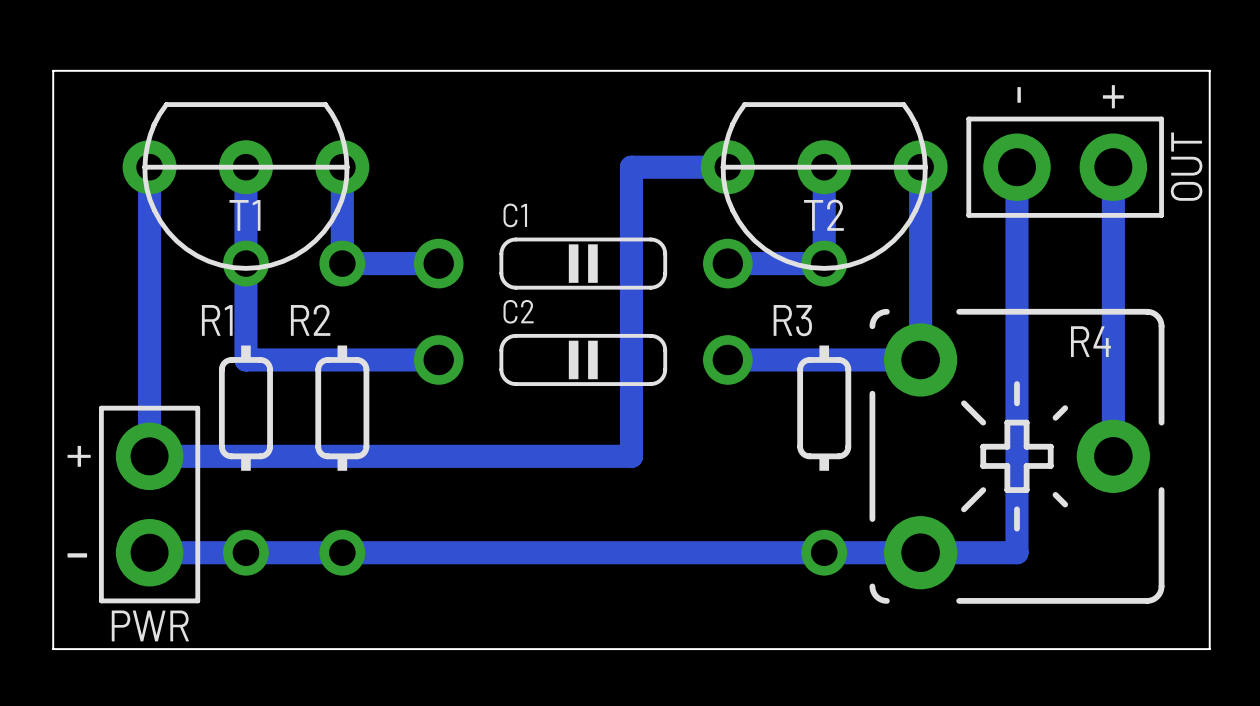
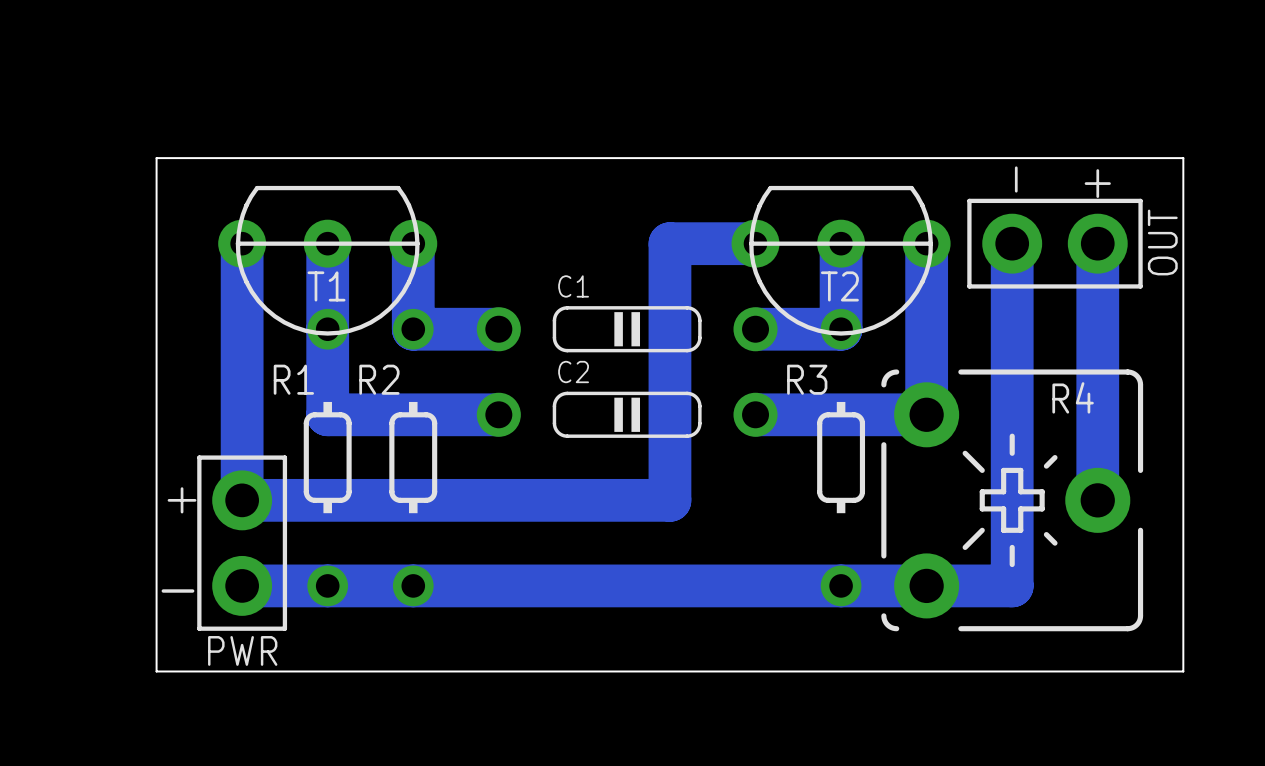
bottom track width: thin (149, 167) (149, 456) (631, 456) (631, 167) (727, 167) -> thick (242, 243) (242, 500) (669, 500) (669, 243) (755, 243)
bottom track width: thin (245, 167) (245, 359) (438, 359) -> thick (327, 243) (327, 414) (498, 414)
bottom track width: thin (342, 167) (342, 263) (438, 263) -> thick (413, 243) (413, 329) (498, 329)
bottom track width: thin (824, 167) (824, 263) (727, 263) -> thick (841, 243) (841, 329) (755, 329)
bottom track width: thin (920, 167) (920, 359) (727, 359) -> thick (926, 243) (926, 414) (755, 414)
bottom track width: thin (1016, 167) (1016, 552) (149, 552) -> thick (1012, 243) (1012, 585) (242, 585)
bottom track width: thin (1113, 167) (1113, 456) -> thick (1097, 243) (1097, 500)

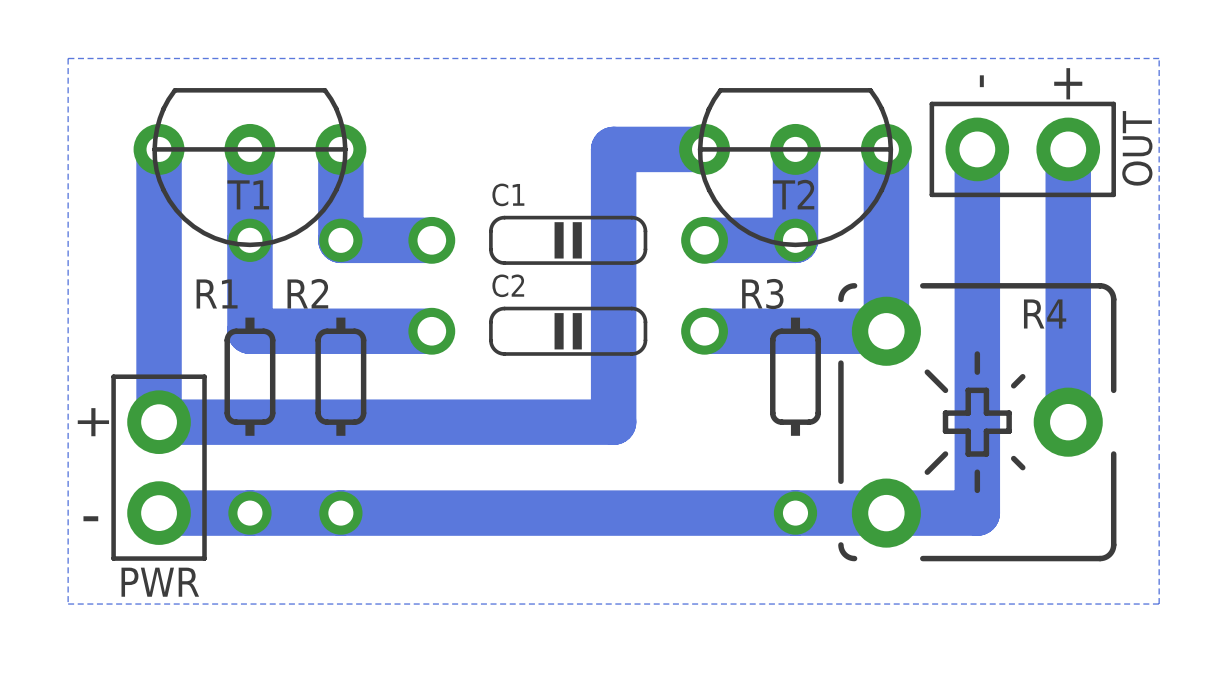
board edge: (156, 158) (1183, 158) (1183, 671) (156, 671) (156, 158) -> none
bottom zone outline: none -> (68, 58) (68, 604) (1159, 604) (1159, 58) (68, 58)

